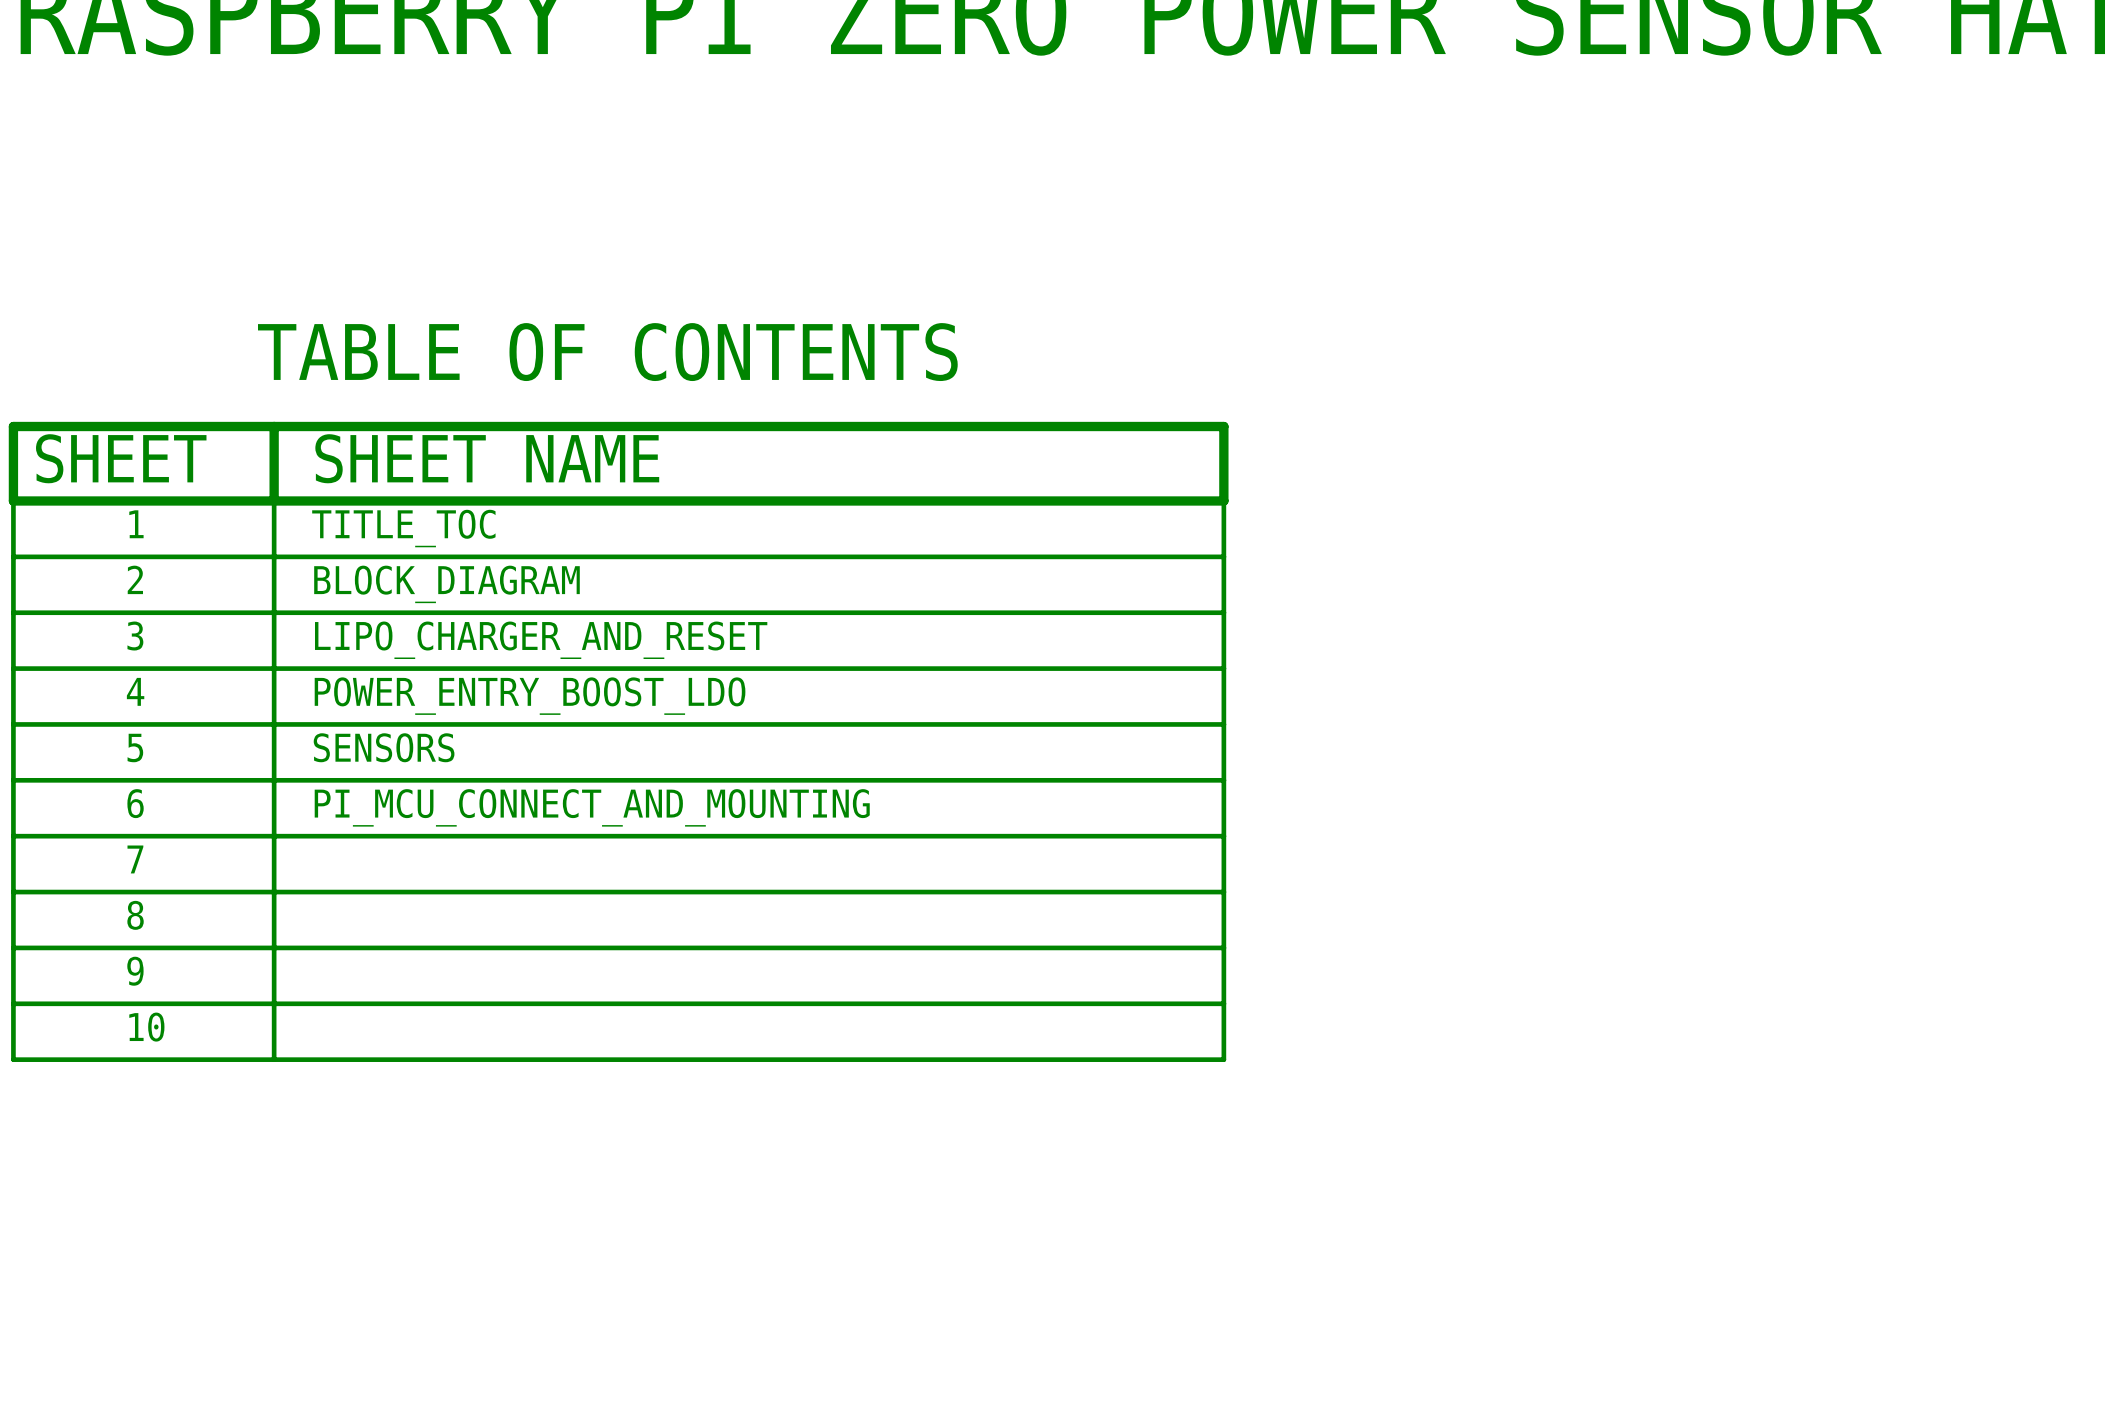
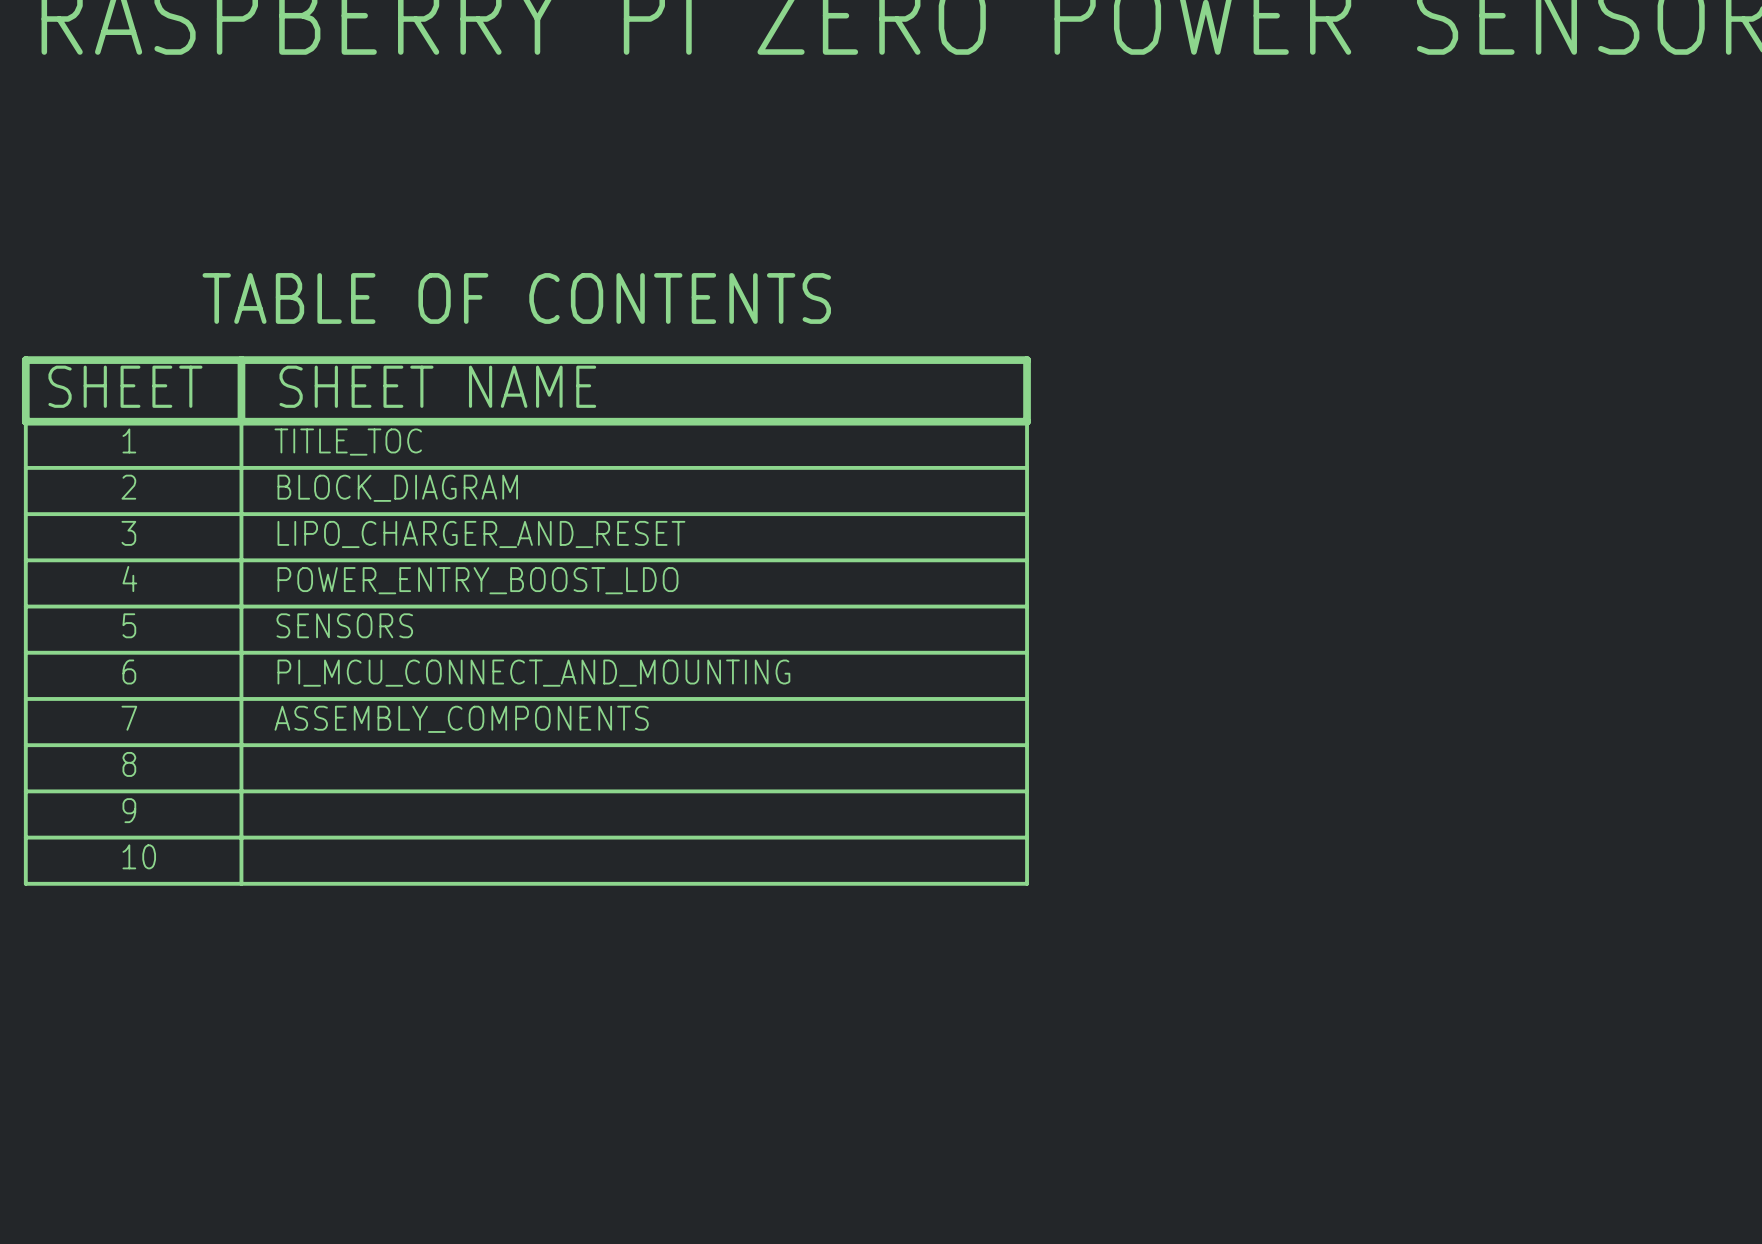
text: none -> ASSEMBLY_COMPONENTS (461, 719)

